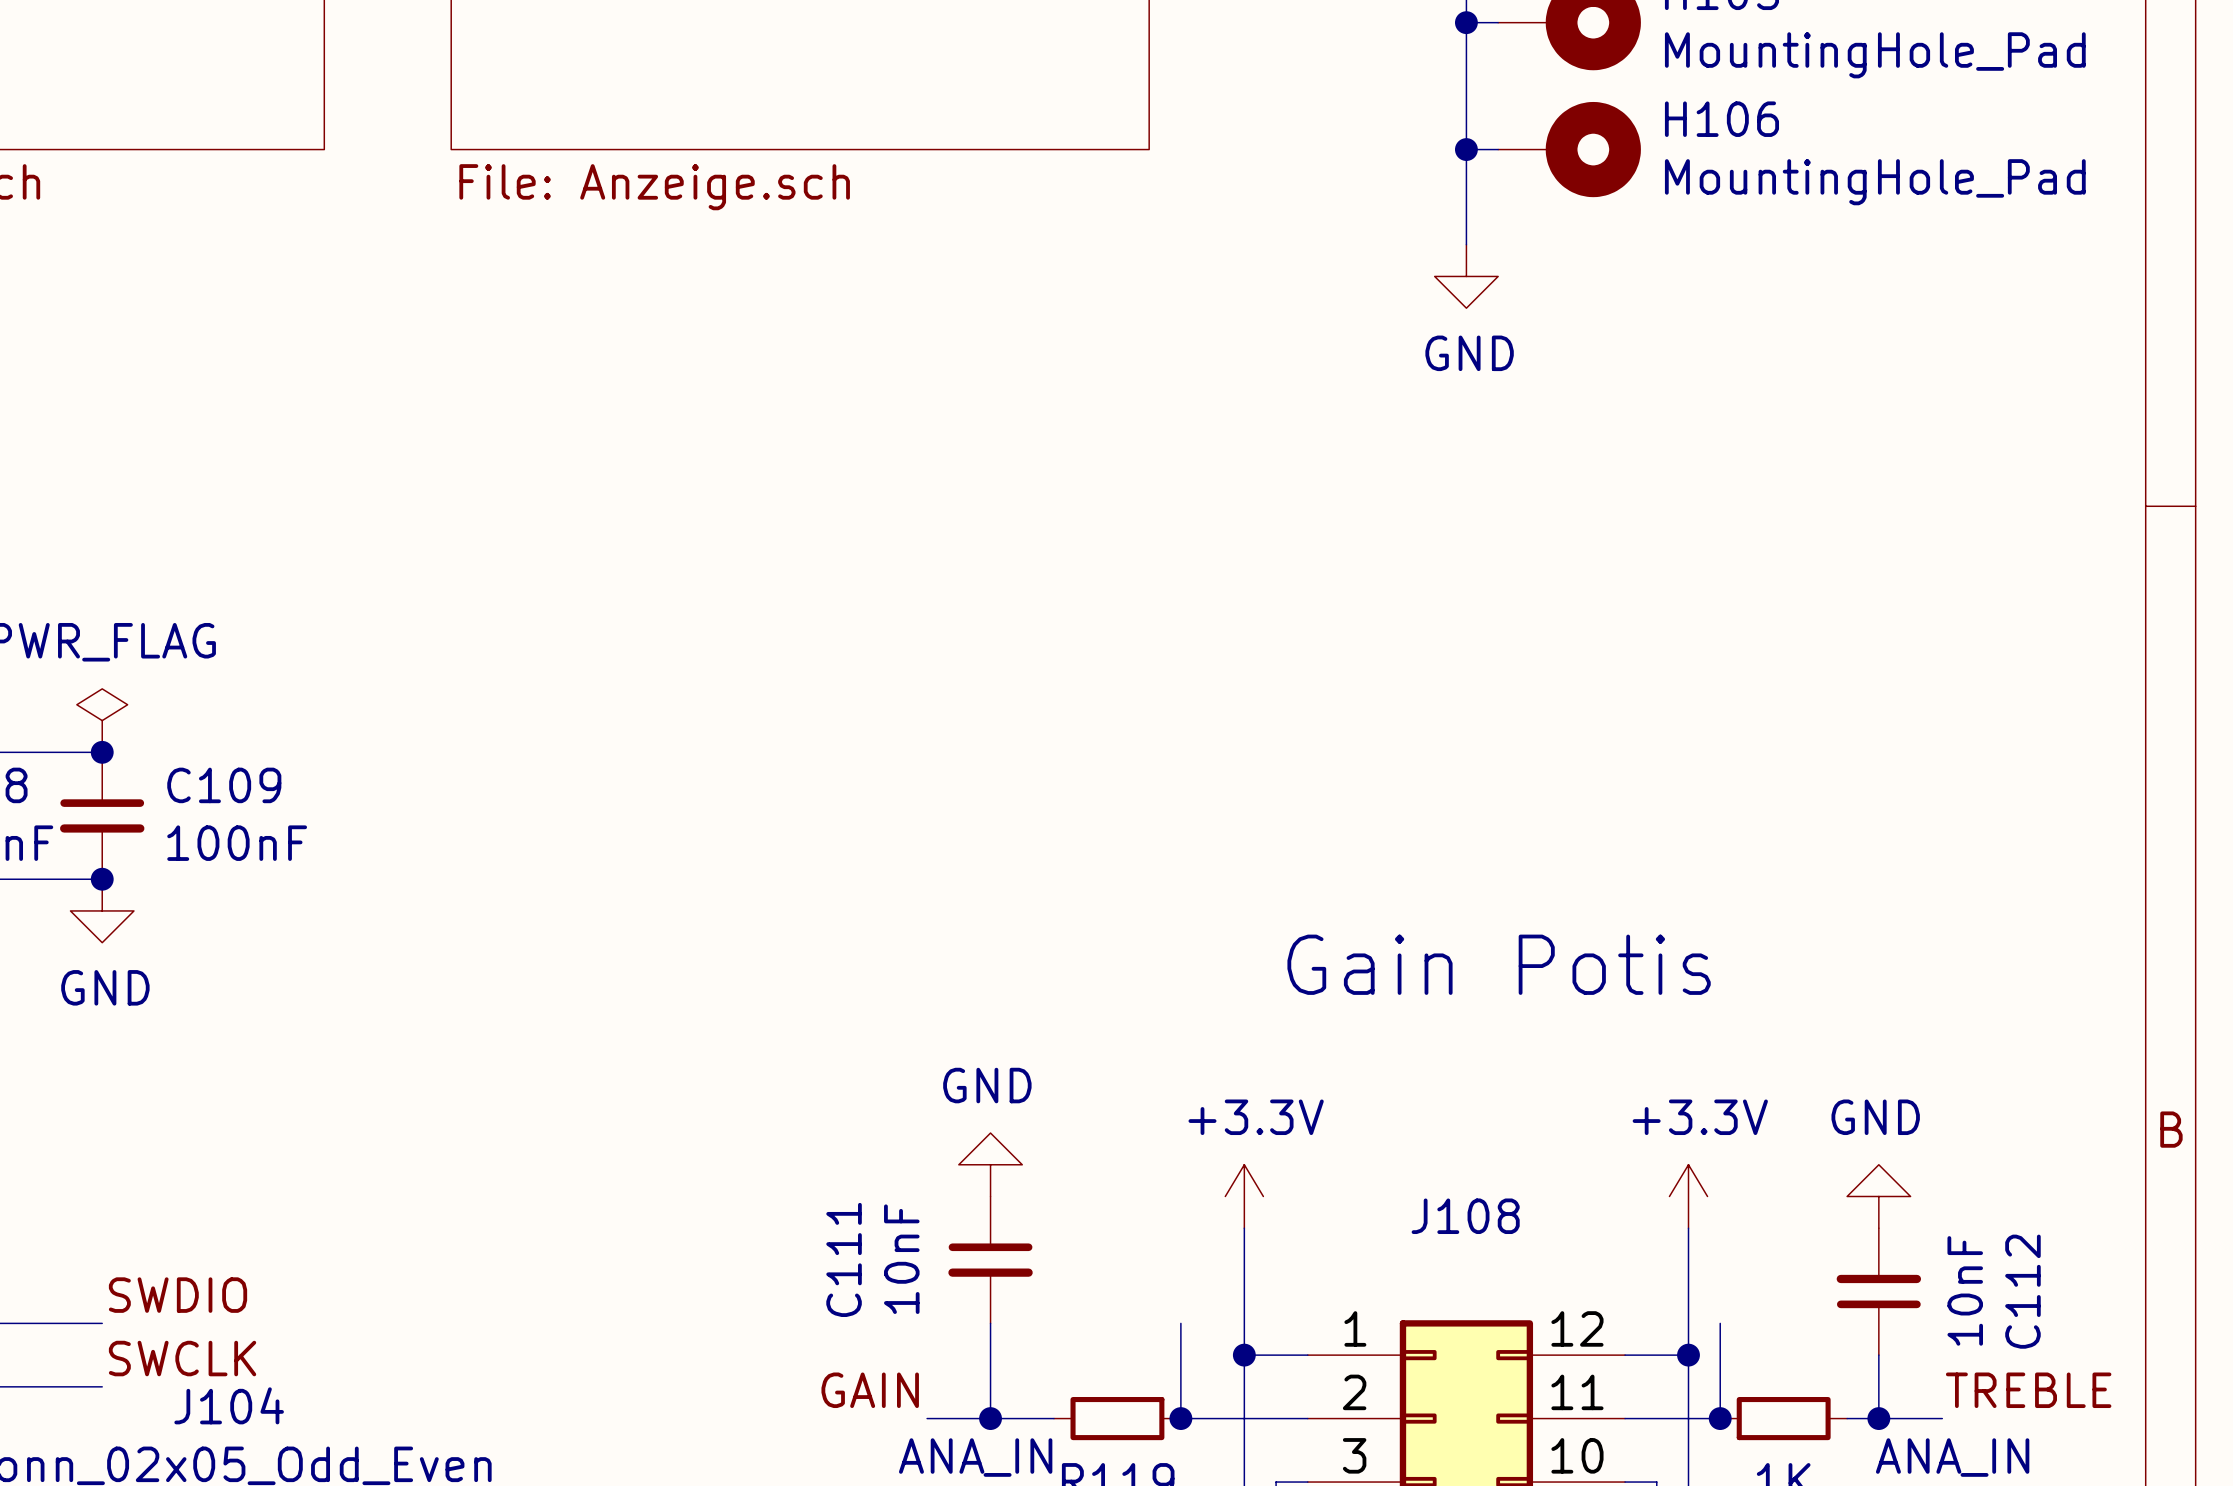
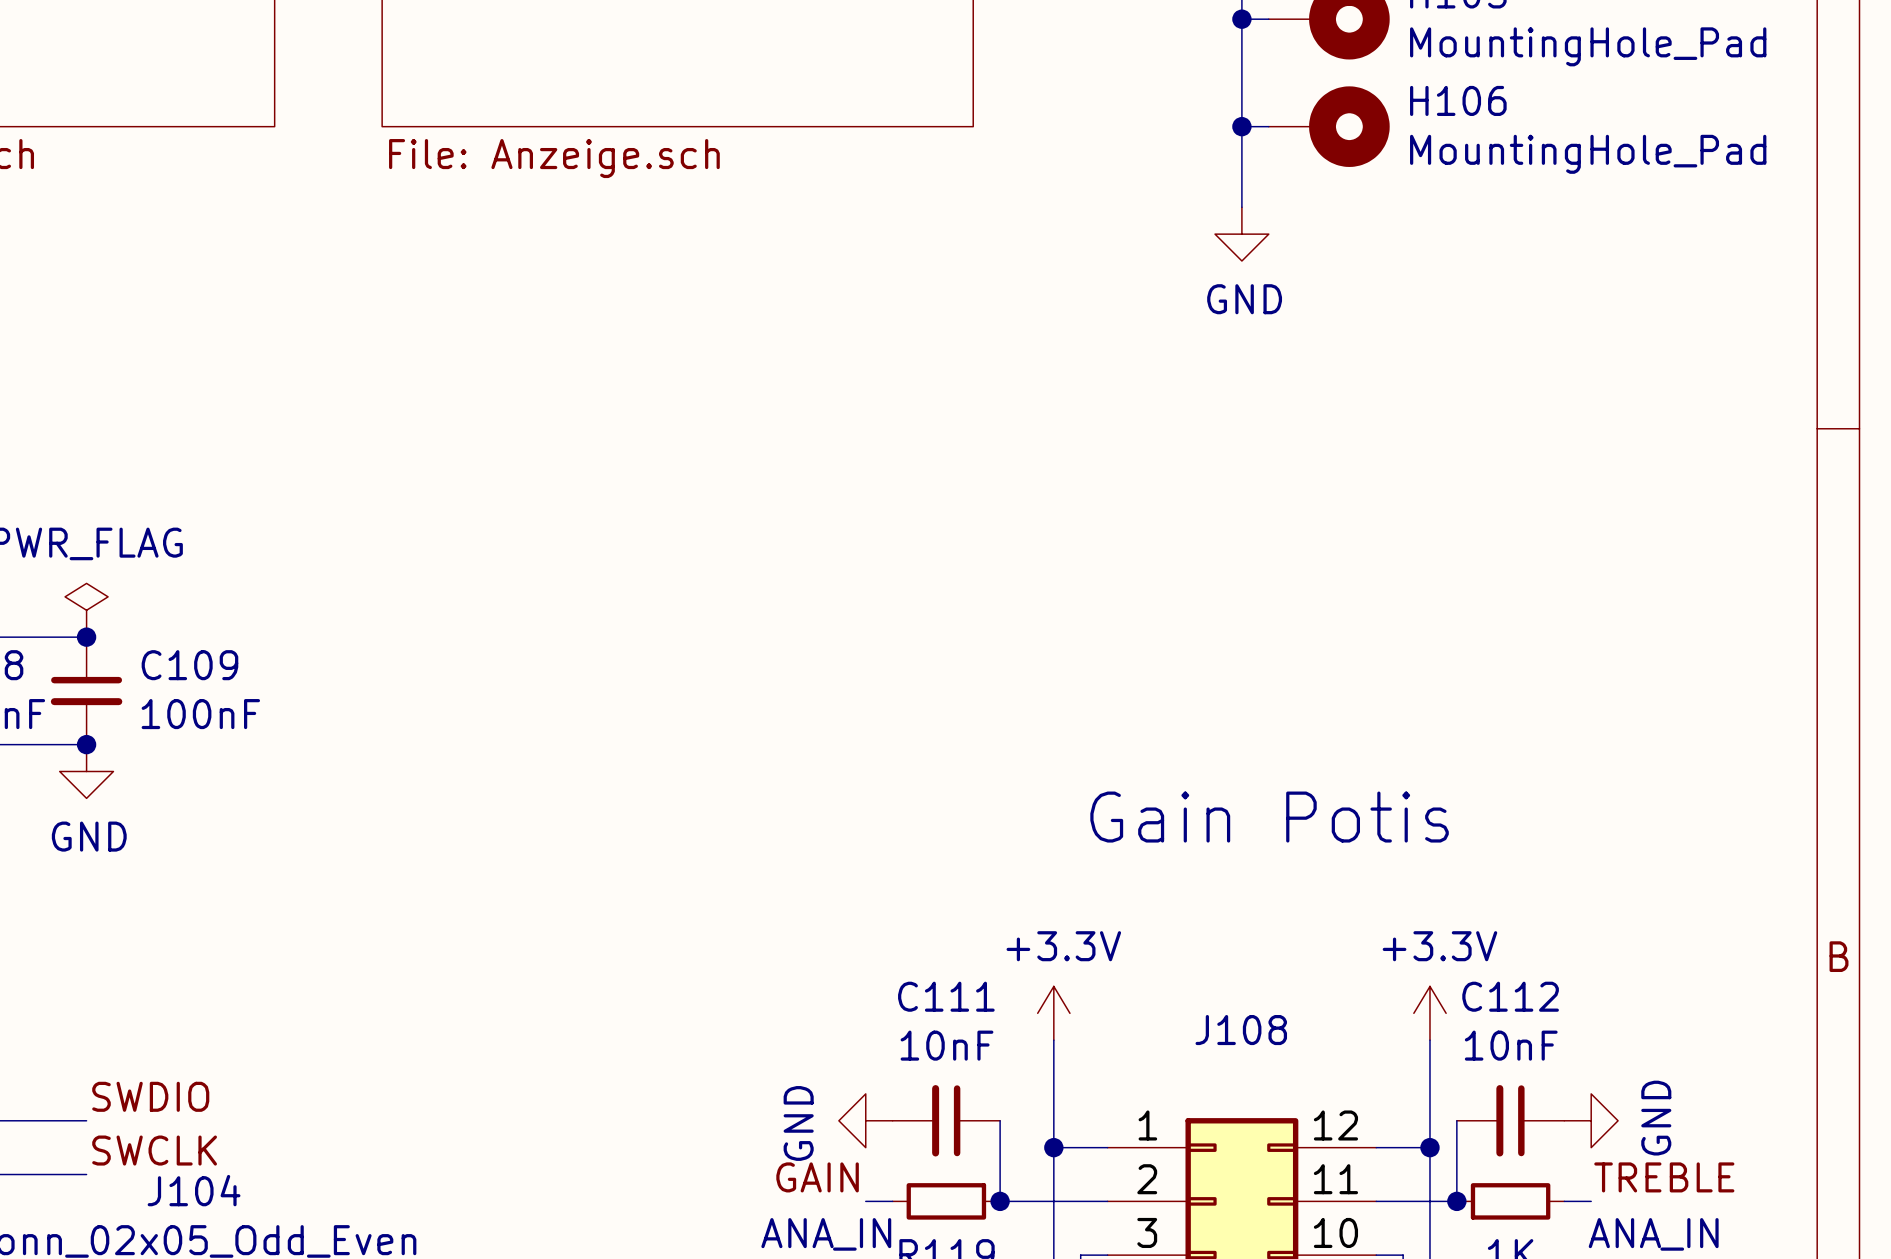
power symbol rotation: 0° (990, 1164) -> 90° counterclockwise (865, 1120)
power symbol position: GND (990, 1164) -> GND (865, 1120)
power symbol rotation: 0° (1878, 1196) -> 90° clockwise (1591, 1120)
power symbol position: GND (1878, 1196) -> GND (1591, 1120)
C111 position: (990, 1259) -> (946, 1120)
C111 rotation: 0° (990, 1260) -> 90° clockwise (946, 1120)
C112 rotation: 0° (1878, 1291) -> 90° counterclockwise (1510, 1120)
C112 position: (1878, 1291) -> (1510, 1120)
wire: (990, 1323) (990, 1418) -> none
wire: (1878, 1355) (1878, 1418) (1942, 1418) -> none
label position: GAIN (870, 1390) -> GAIN (817, 1177)
label position: TREBLE (2028, 1390) -> TREBLE (1664, 1177)
wire: (927, 1418) (1022, 1418) -> none
junction: (990, 1418) -> none
junction: (1878, 1418) -> none

